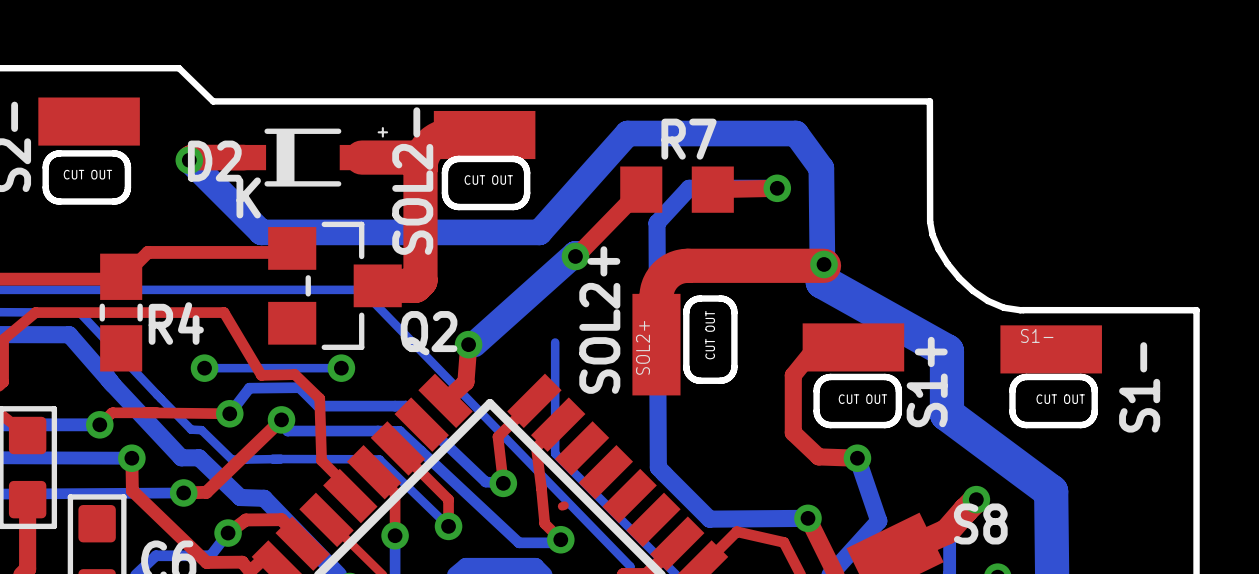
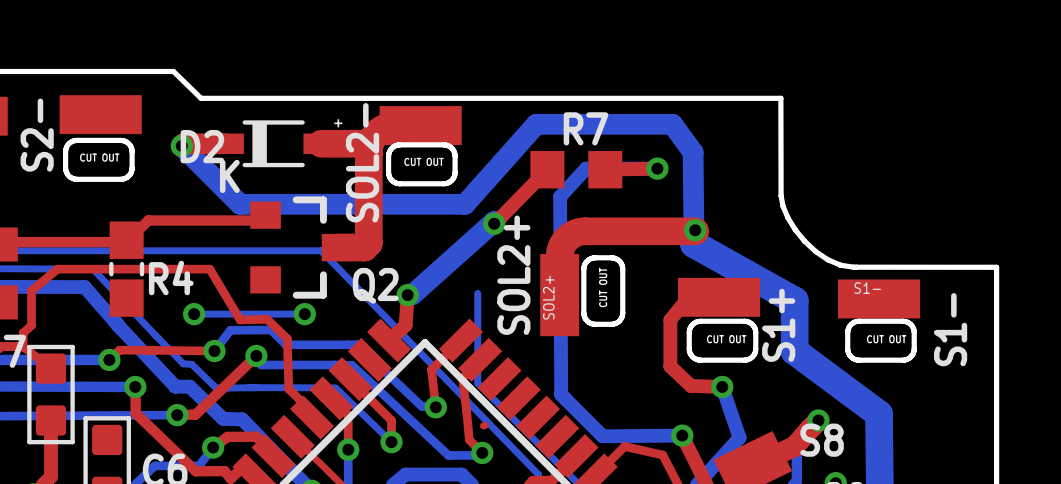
part footprint: [268, 221, 402, 350] -> [250, 196, 353, 299]

